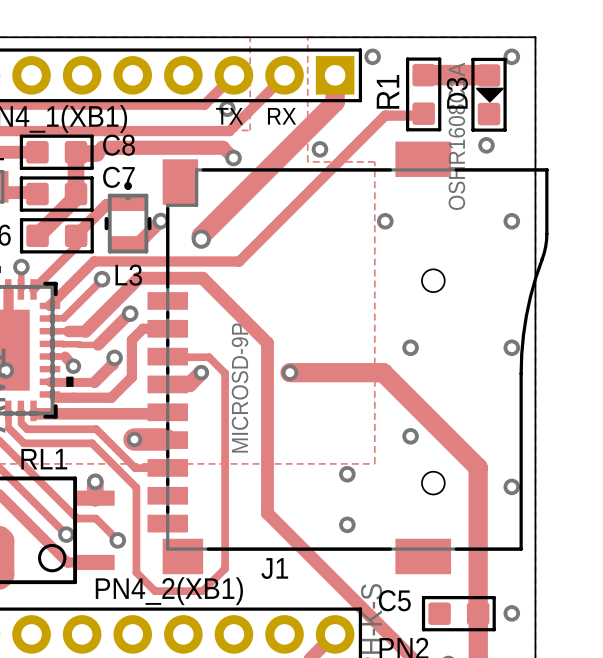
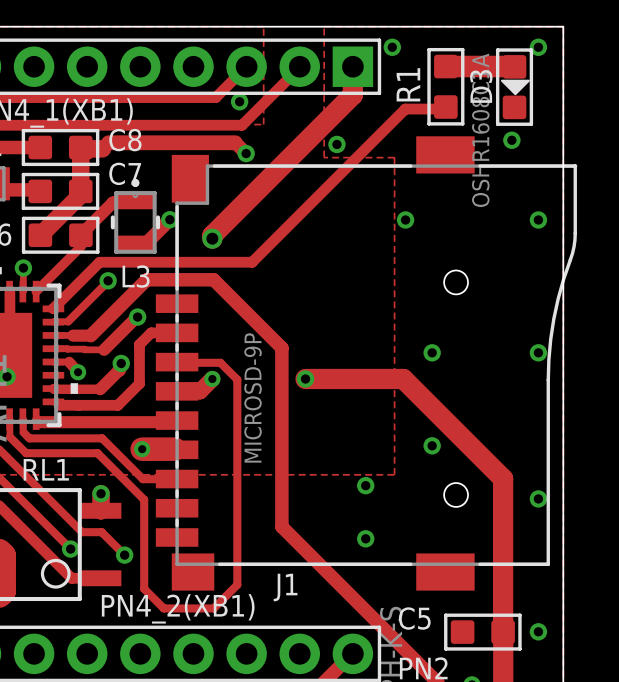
text: TX (229, 116) -> none
text: RX (282, 116) -> none

